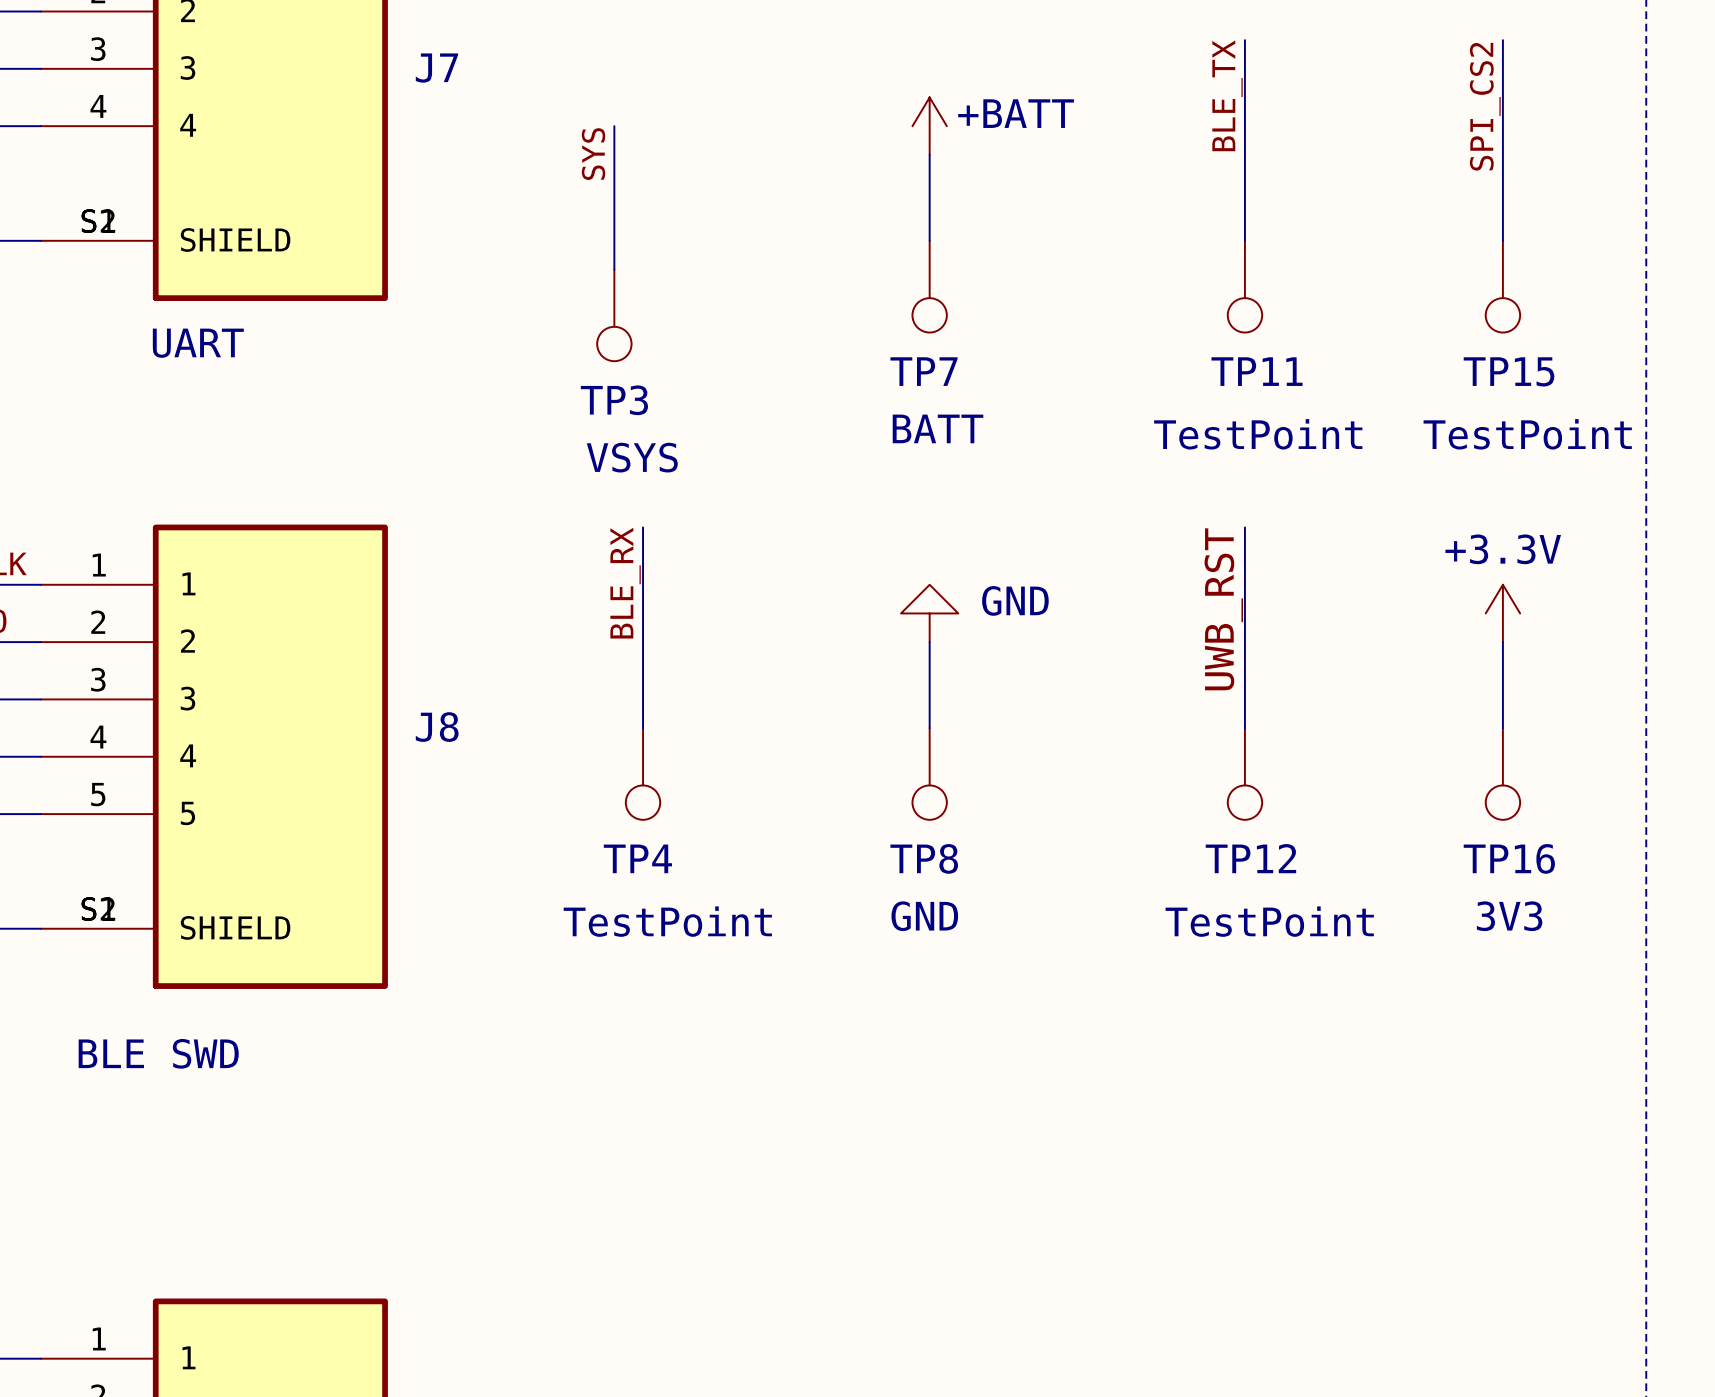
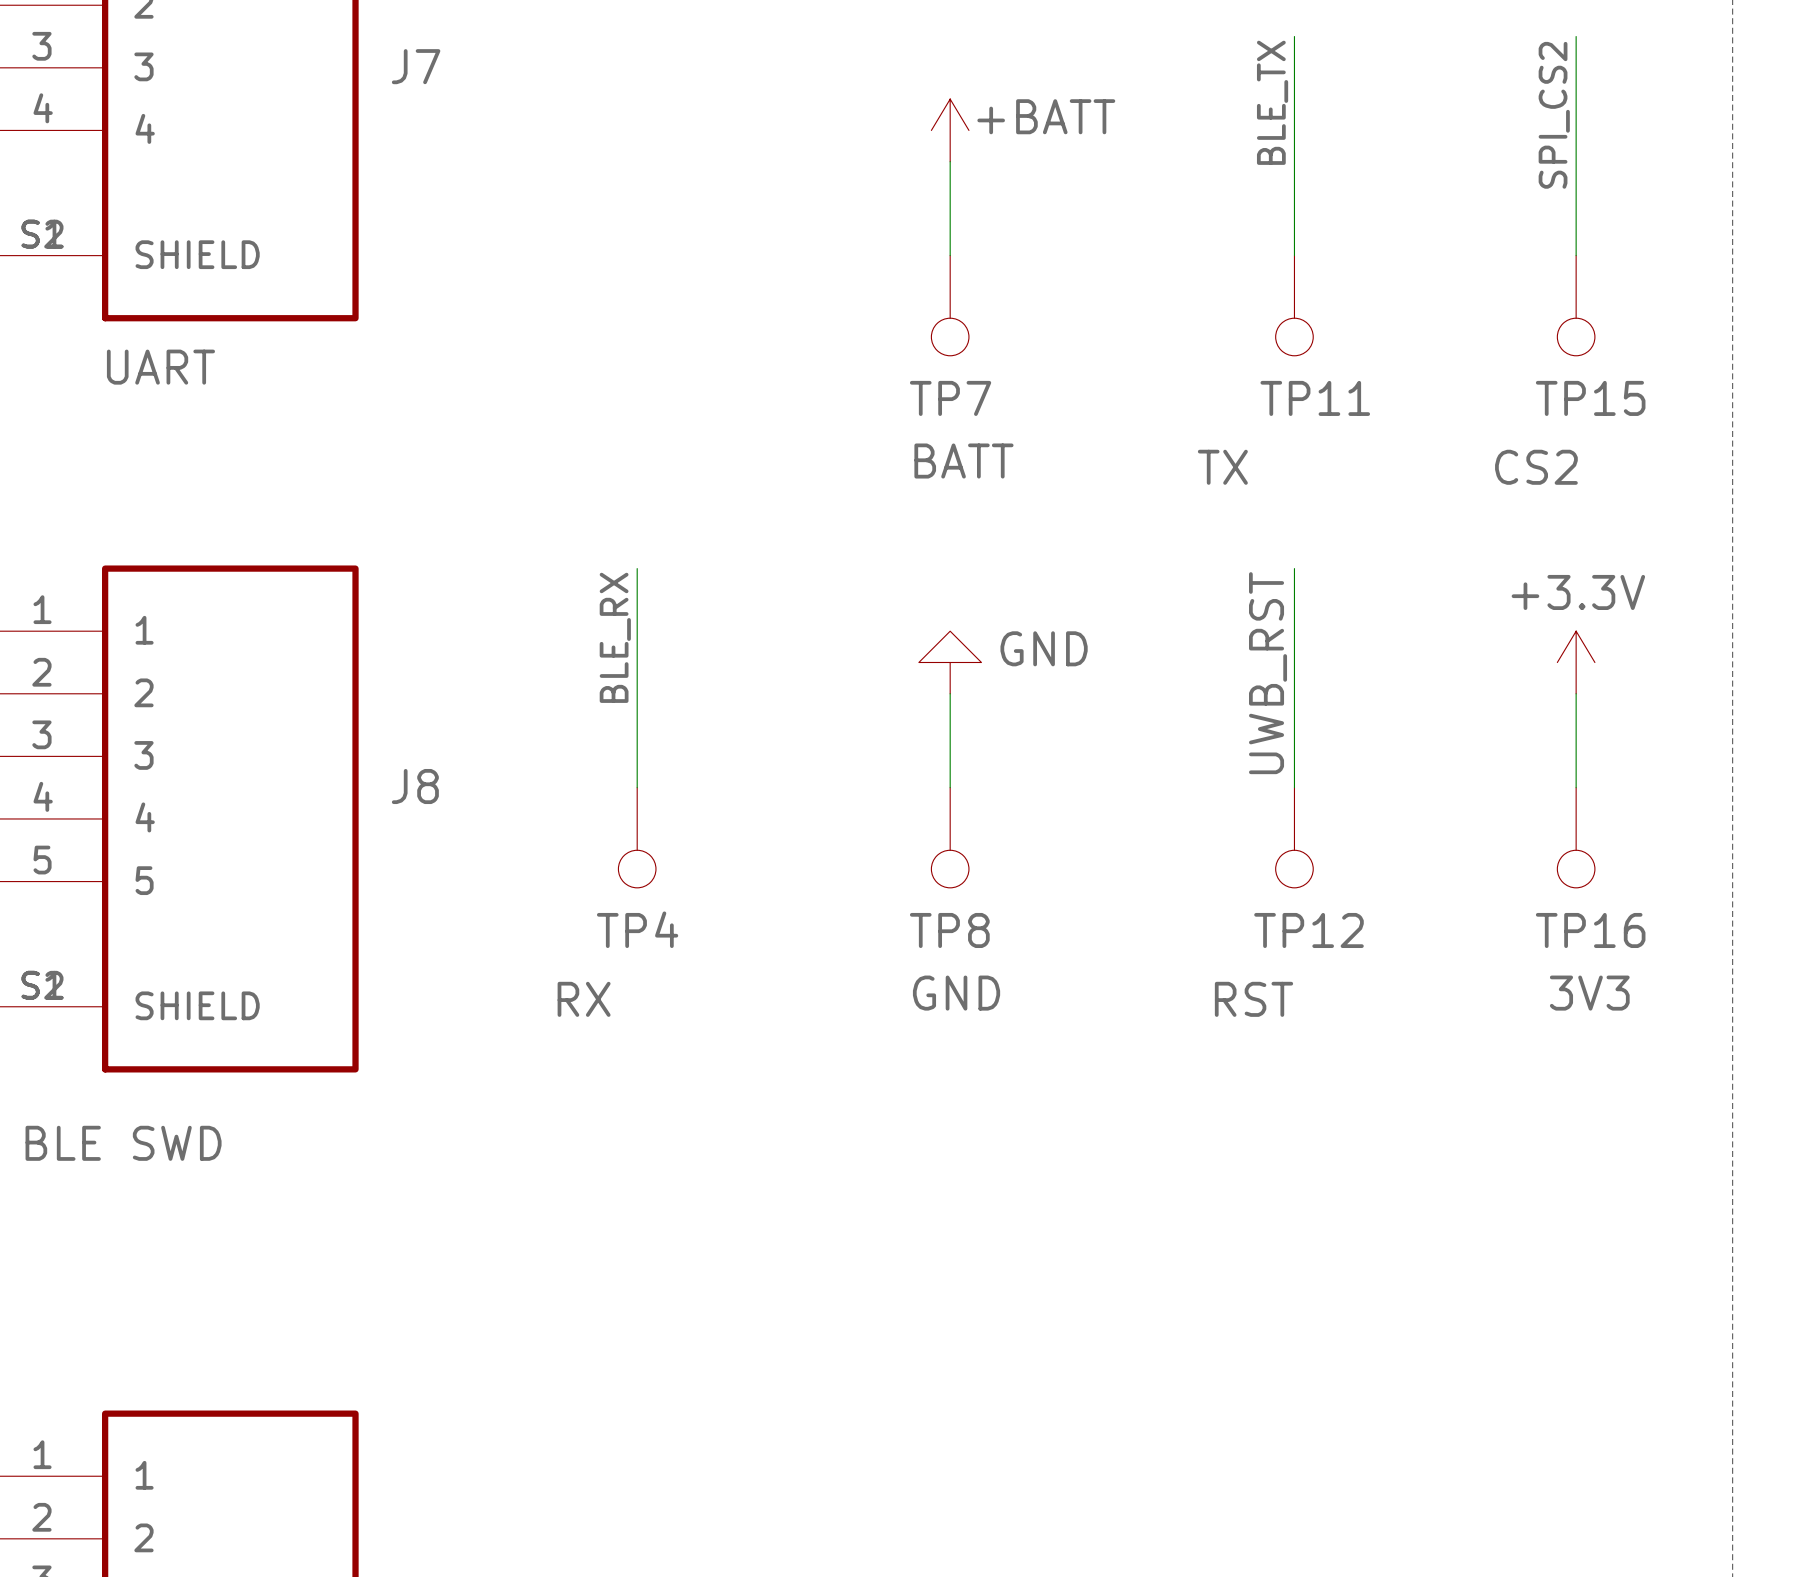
wire: (614, 126) (614, 269) -> none
label: SYS (593, 154) -> none
TP3: VSYS (614, 315) -> none
TP11 value: TestPoint (1258, 434) -> TX (1222, 467)
TP15 value: TestPoint (1527, 434) -> CS2 (1536, 467)
TP4 value: TestPoint (667, 921) -> RX (584, 999)
TP12 value: TestPoint (1269, 921) -> RST (1254, 999)

